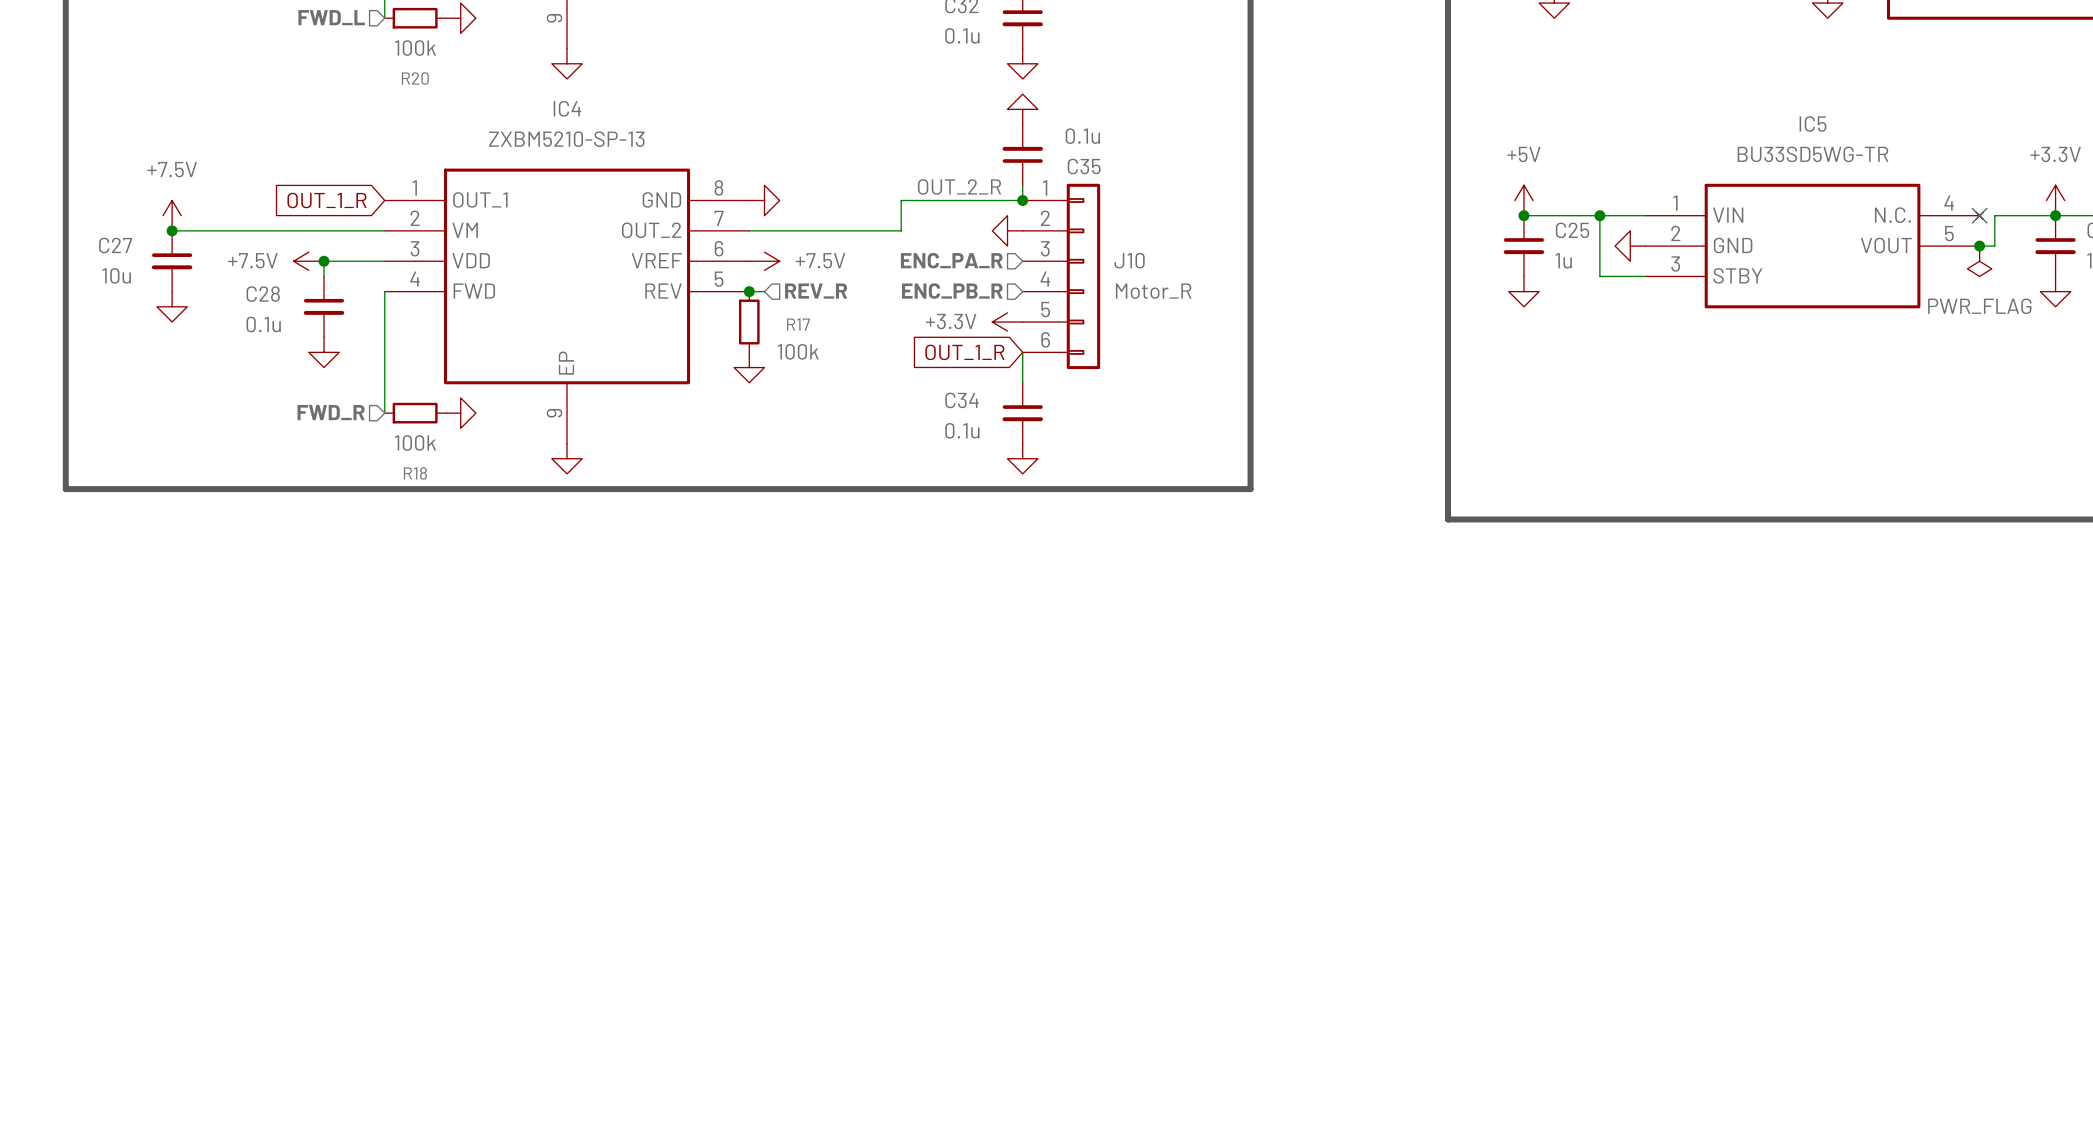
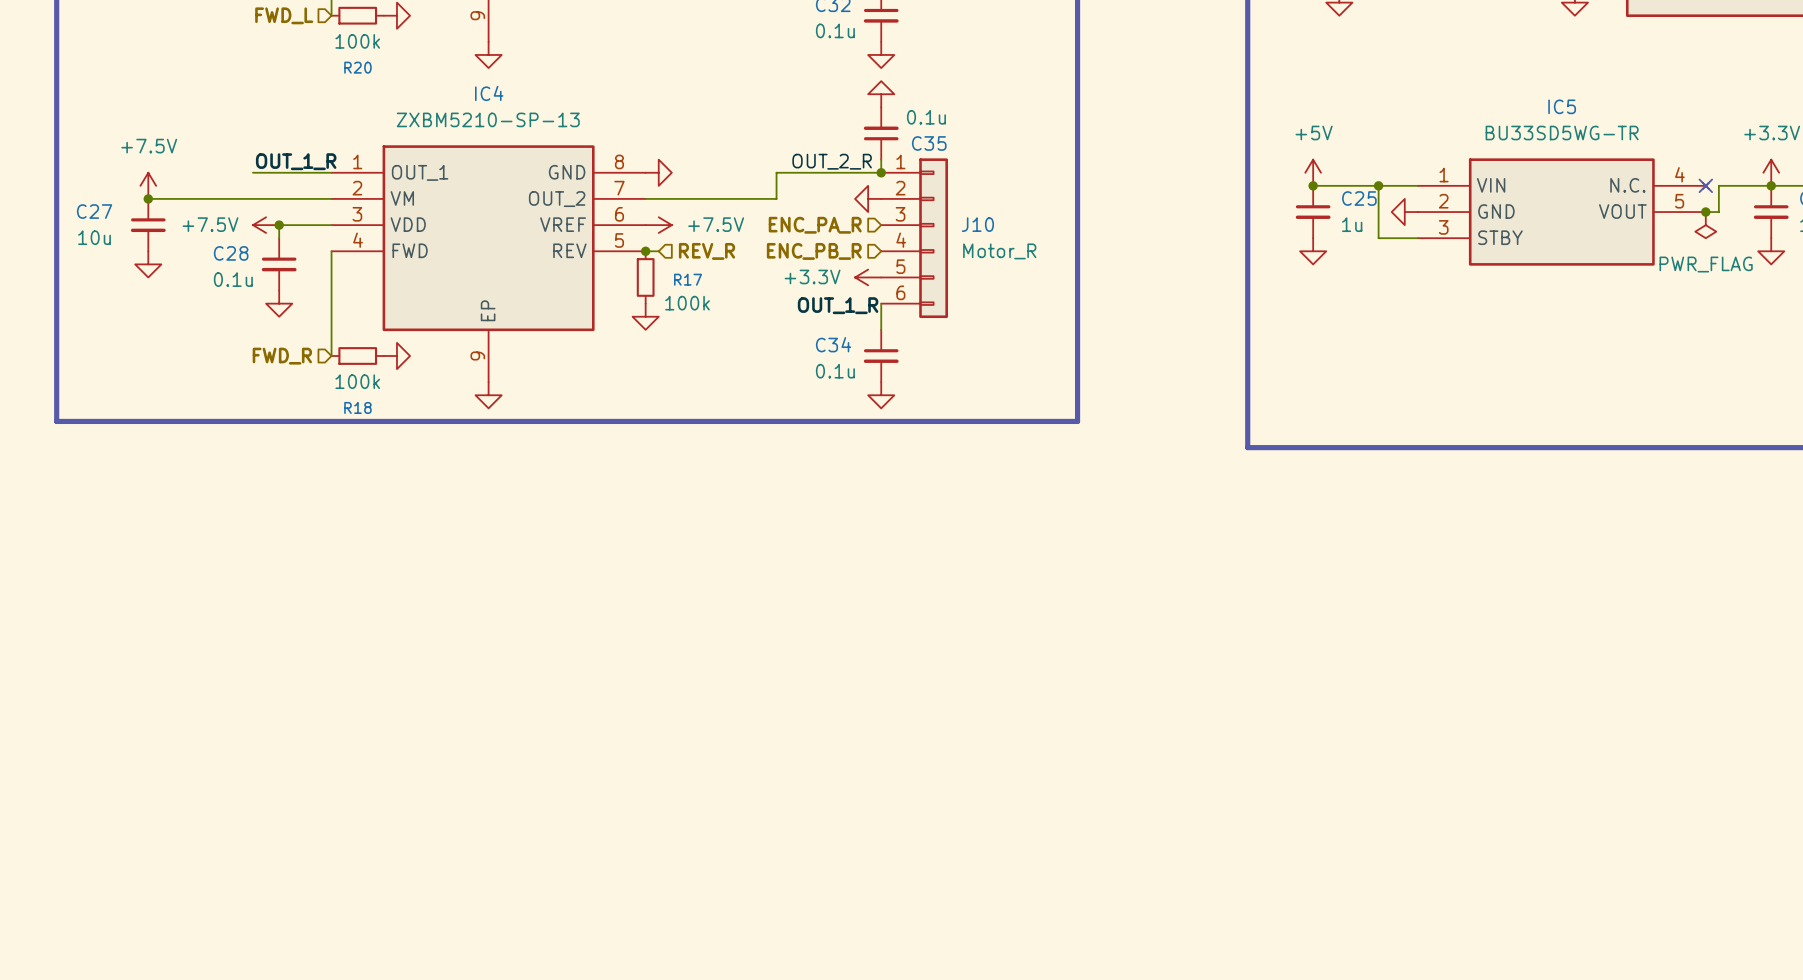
label: none -> OUT_1_R (296, 161)
wire: none -> (253, 172) (331, 172)
global label: OUT_1_R (327, 200) -> none
global label: OUT_1_R (964, 352) -> none
label: none -> OUT_1_R (838, 305)

